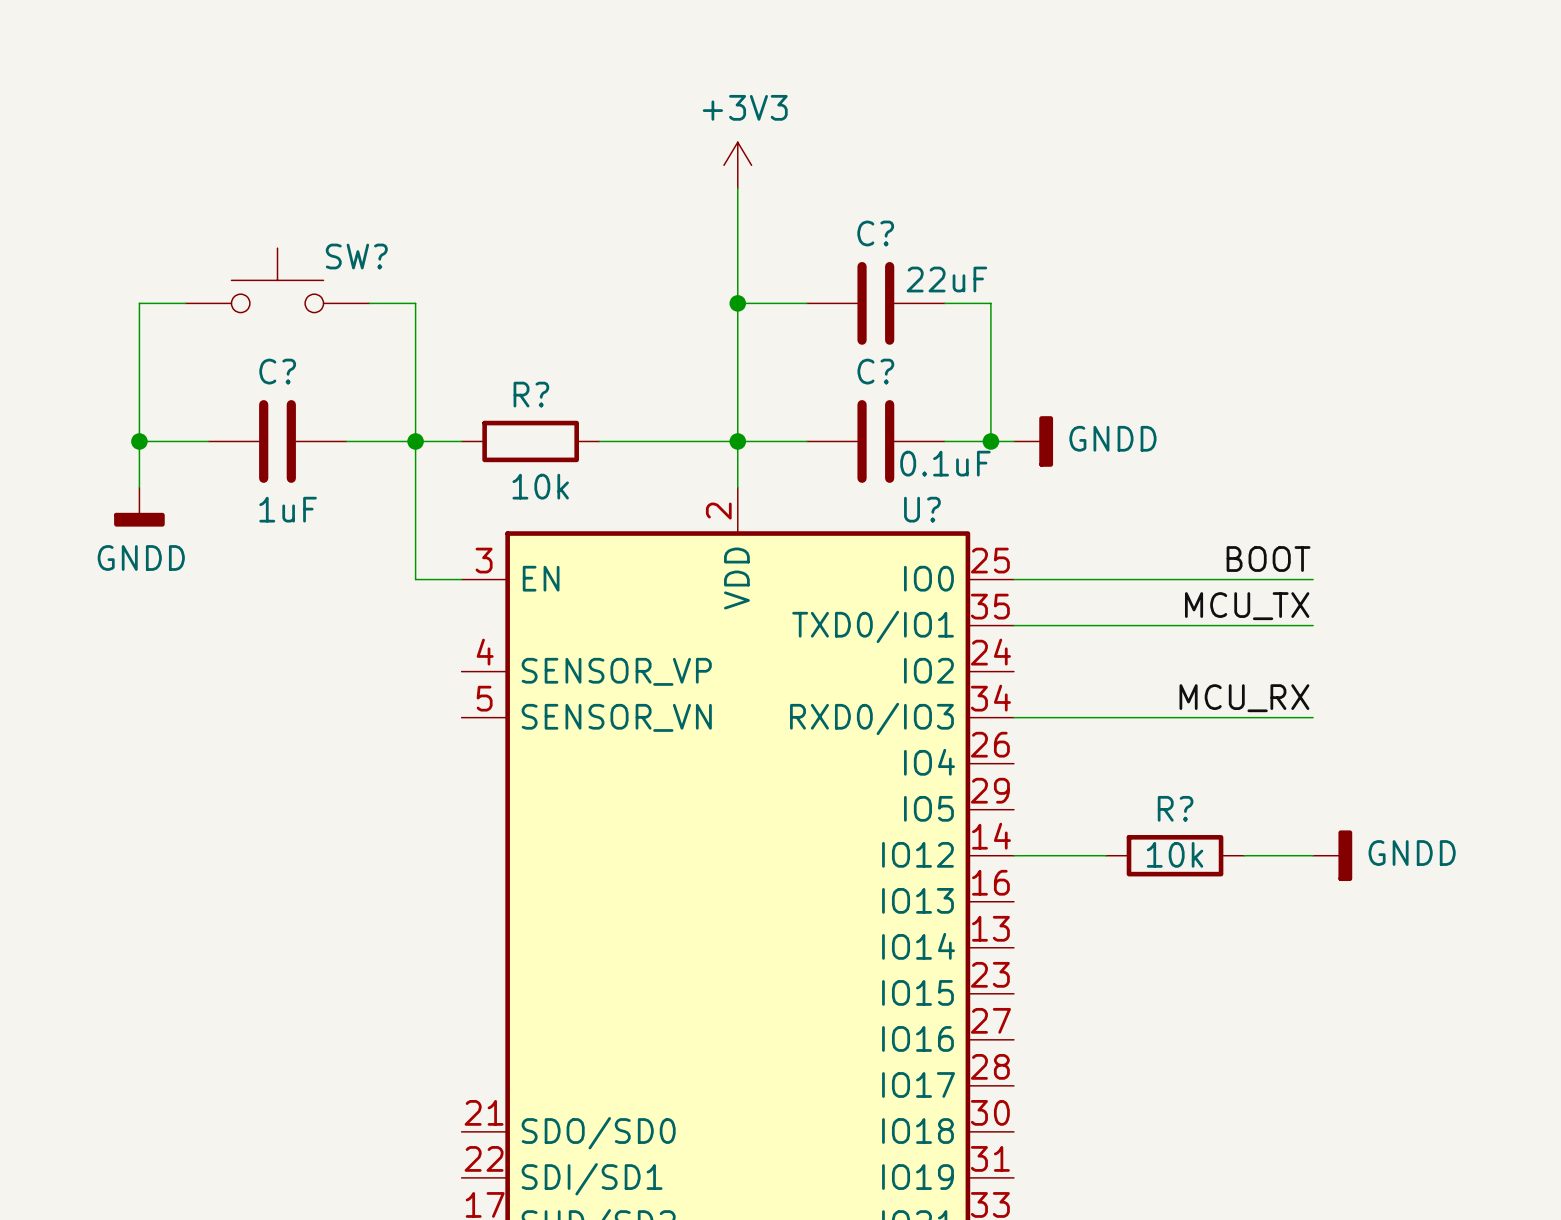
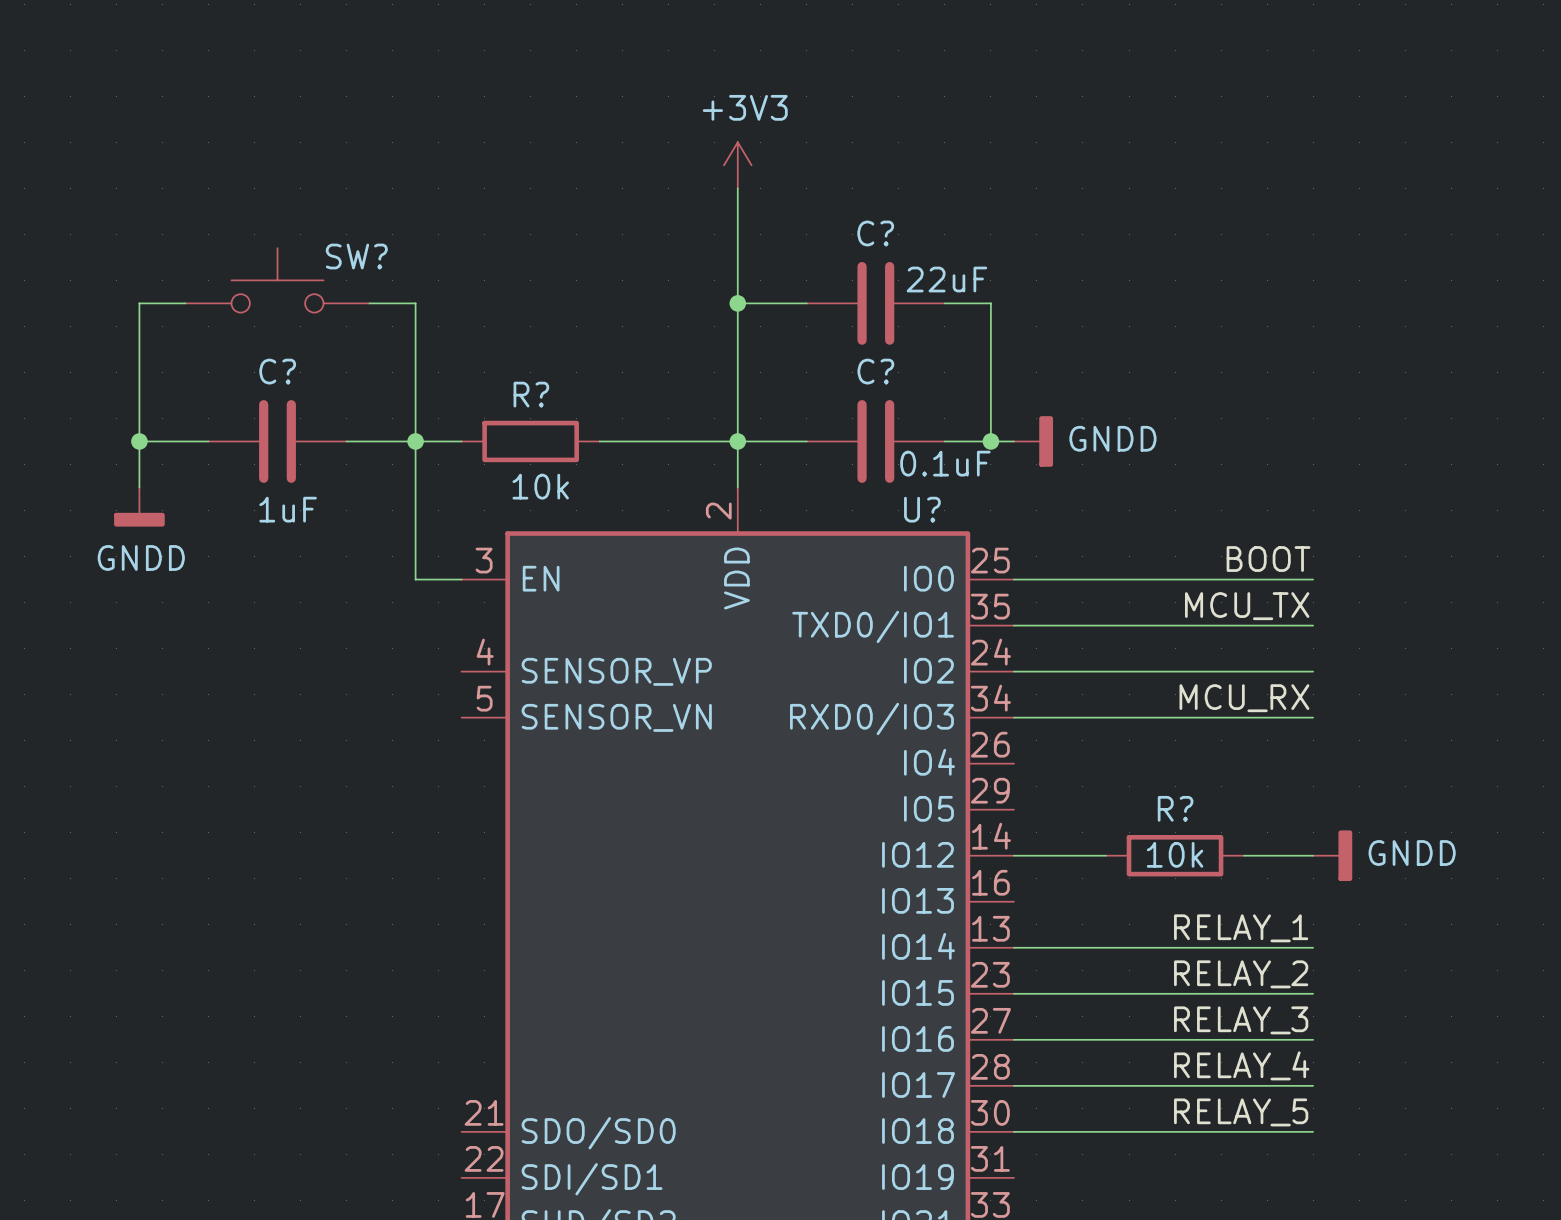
wire: none -> (1013, 671) (1313, 671)
label: none -> RELAY_1 (1241, 928)
wire: none -> (1013, 947) (1313, 947)
label: none -> RELAY_2 (1241, 974)
wire: none -> (1013, 993) (1313, 993)
label: none -> RELAY_3 (1241, 1020)
wire: none -> (1013, 1039) (1313, 1039)
label: none -> RELAY_4 (1241, 1065)
wire: none -> (1013, 1085) (1313, 1085)
label: none -> RELAY_5 (1241, 1112)
wire: none -> (1013, 1131) (1313, 1131)

